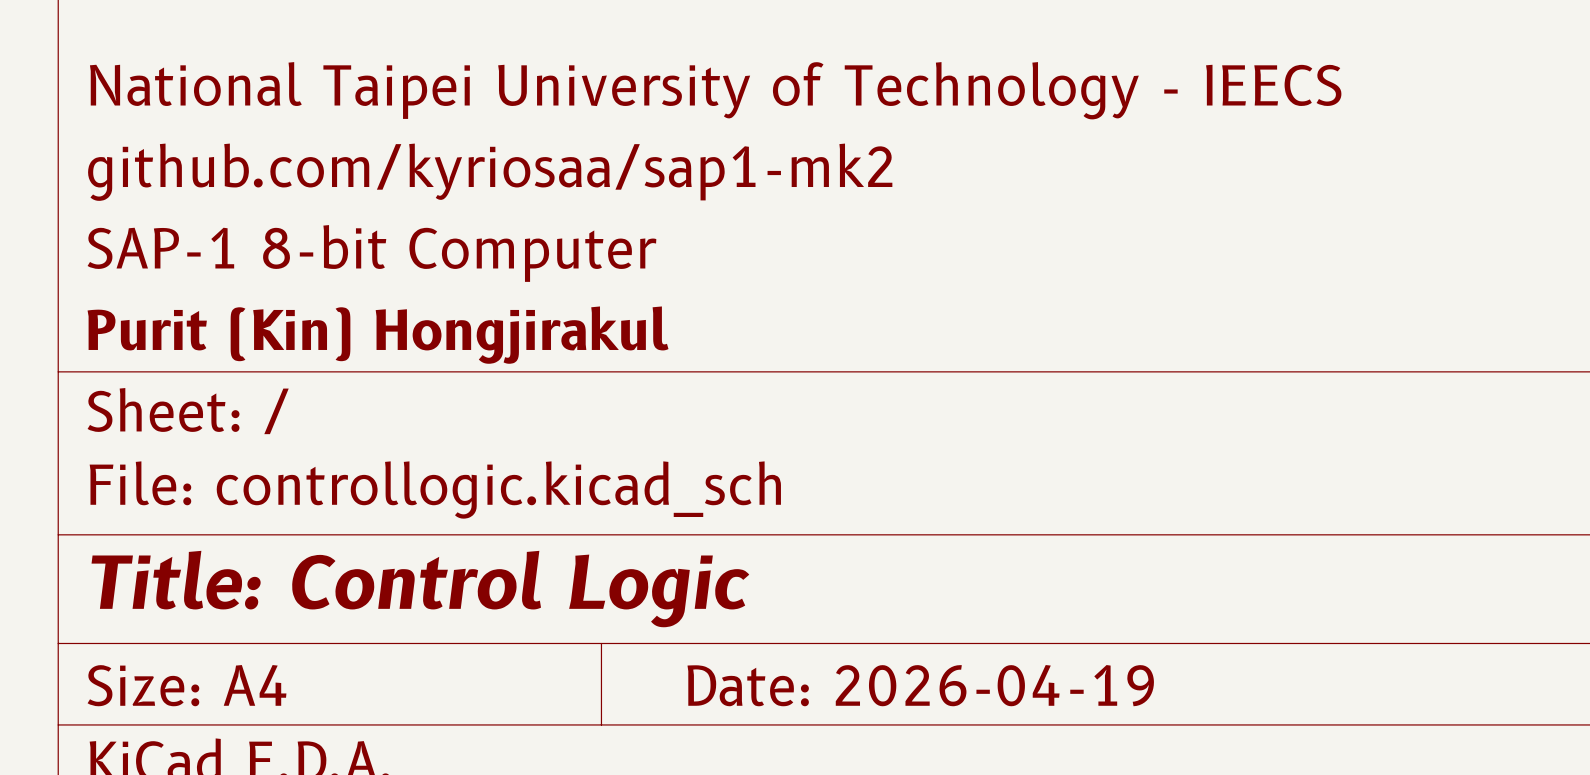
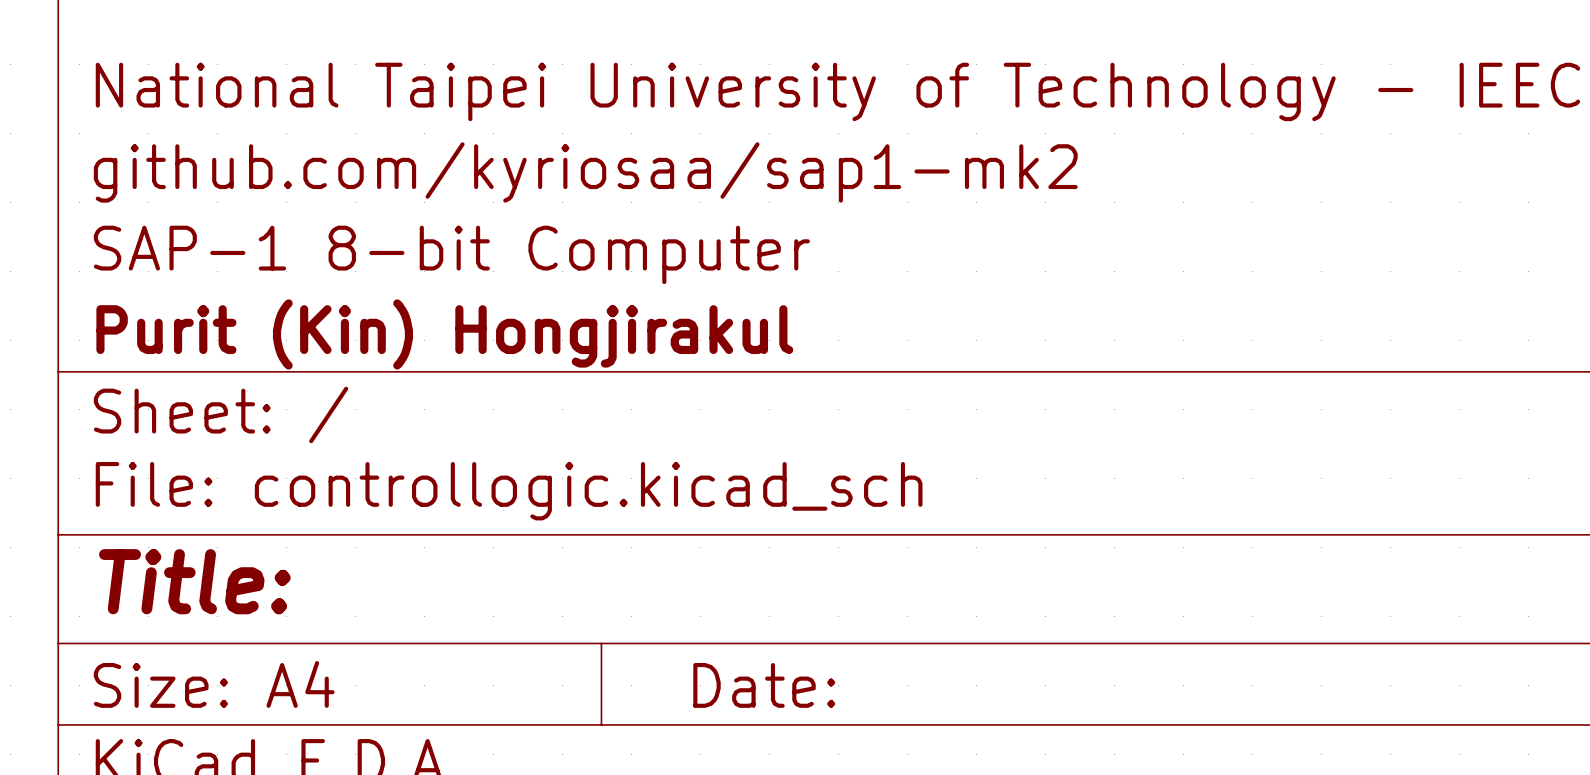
title block: Title: Control Logic (420, 589) -> Title: (194, 581)
title block: Date: 2026-04-19 (920, 685) -> Date: (764, 685)

